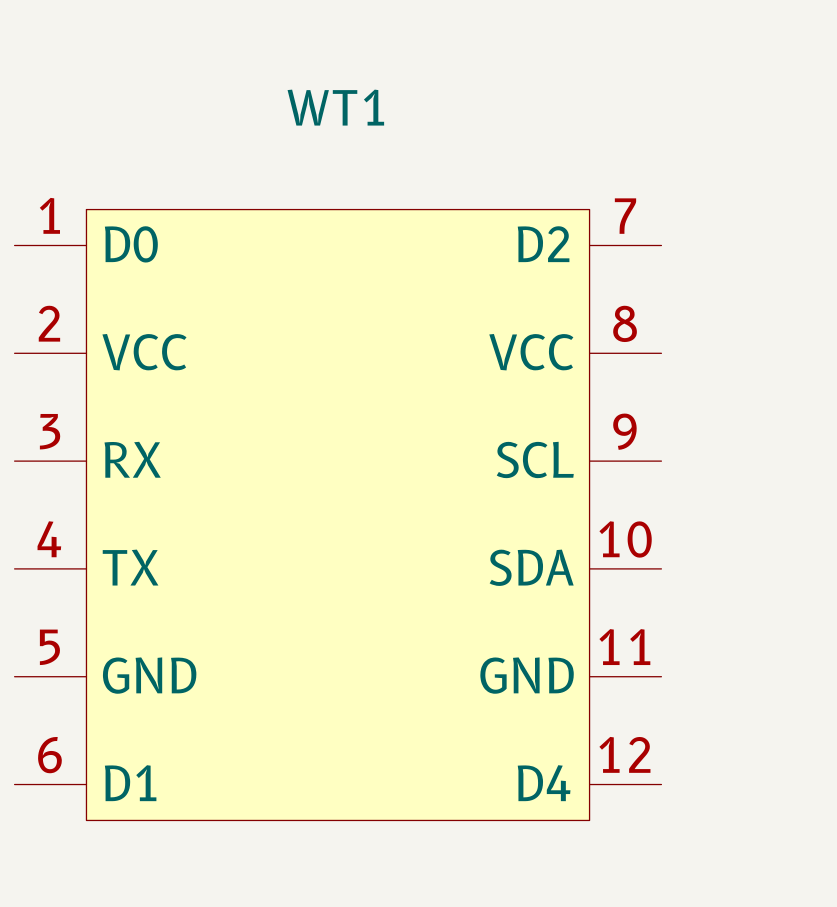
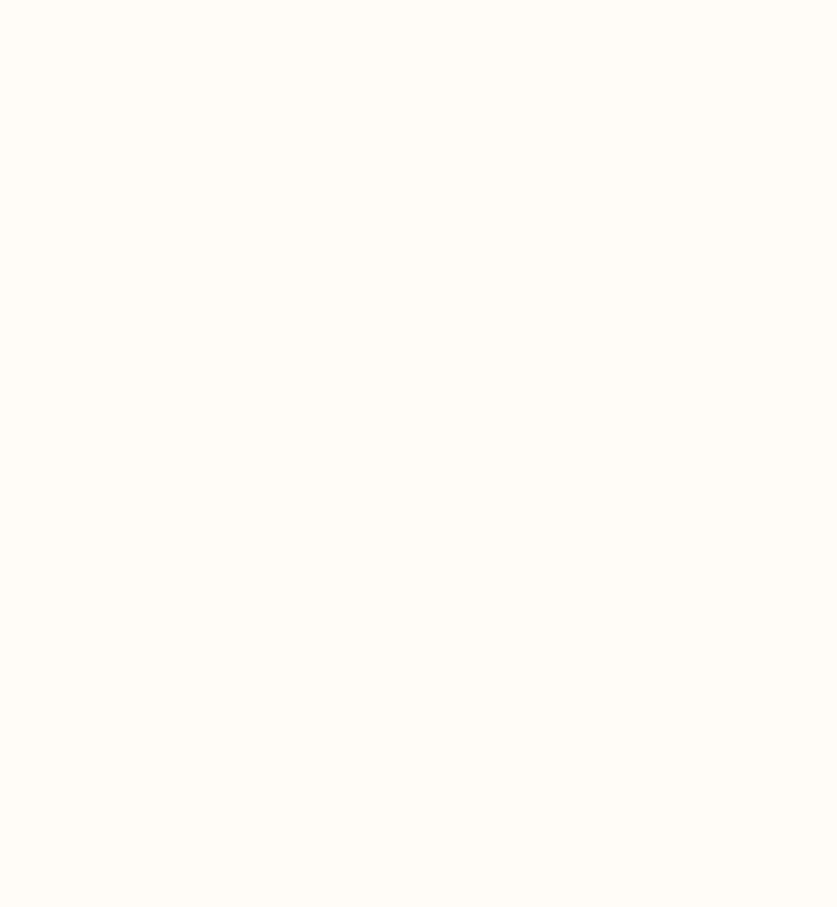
WT1: (338, 515) -> none

